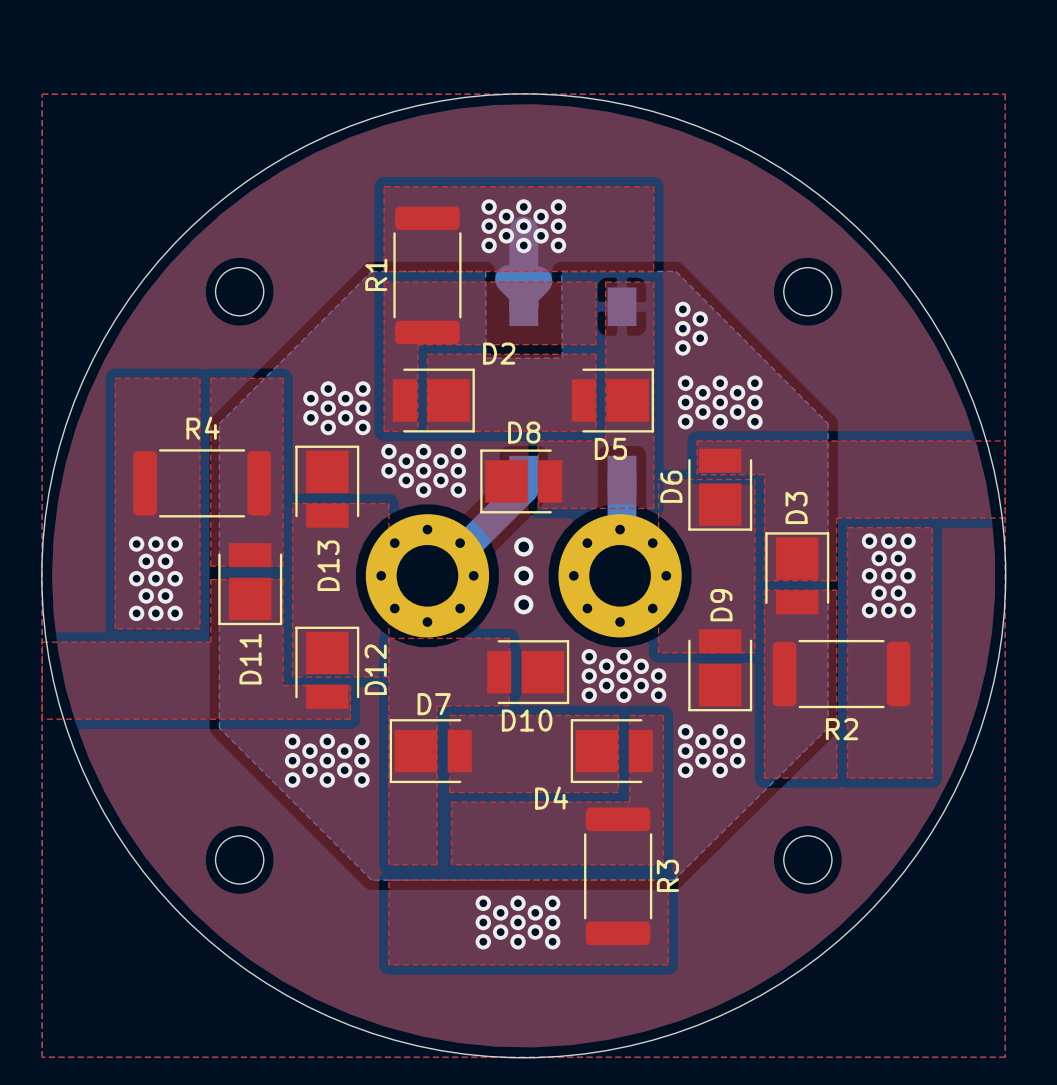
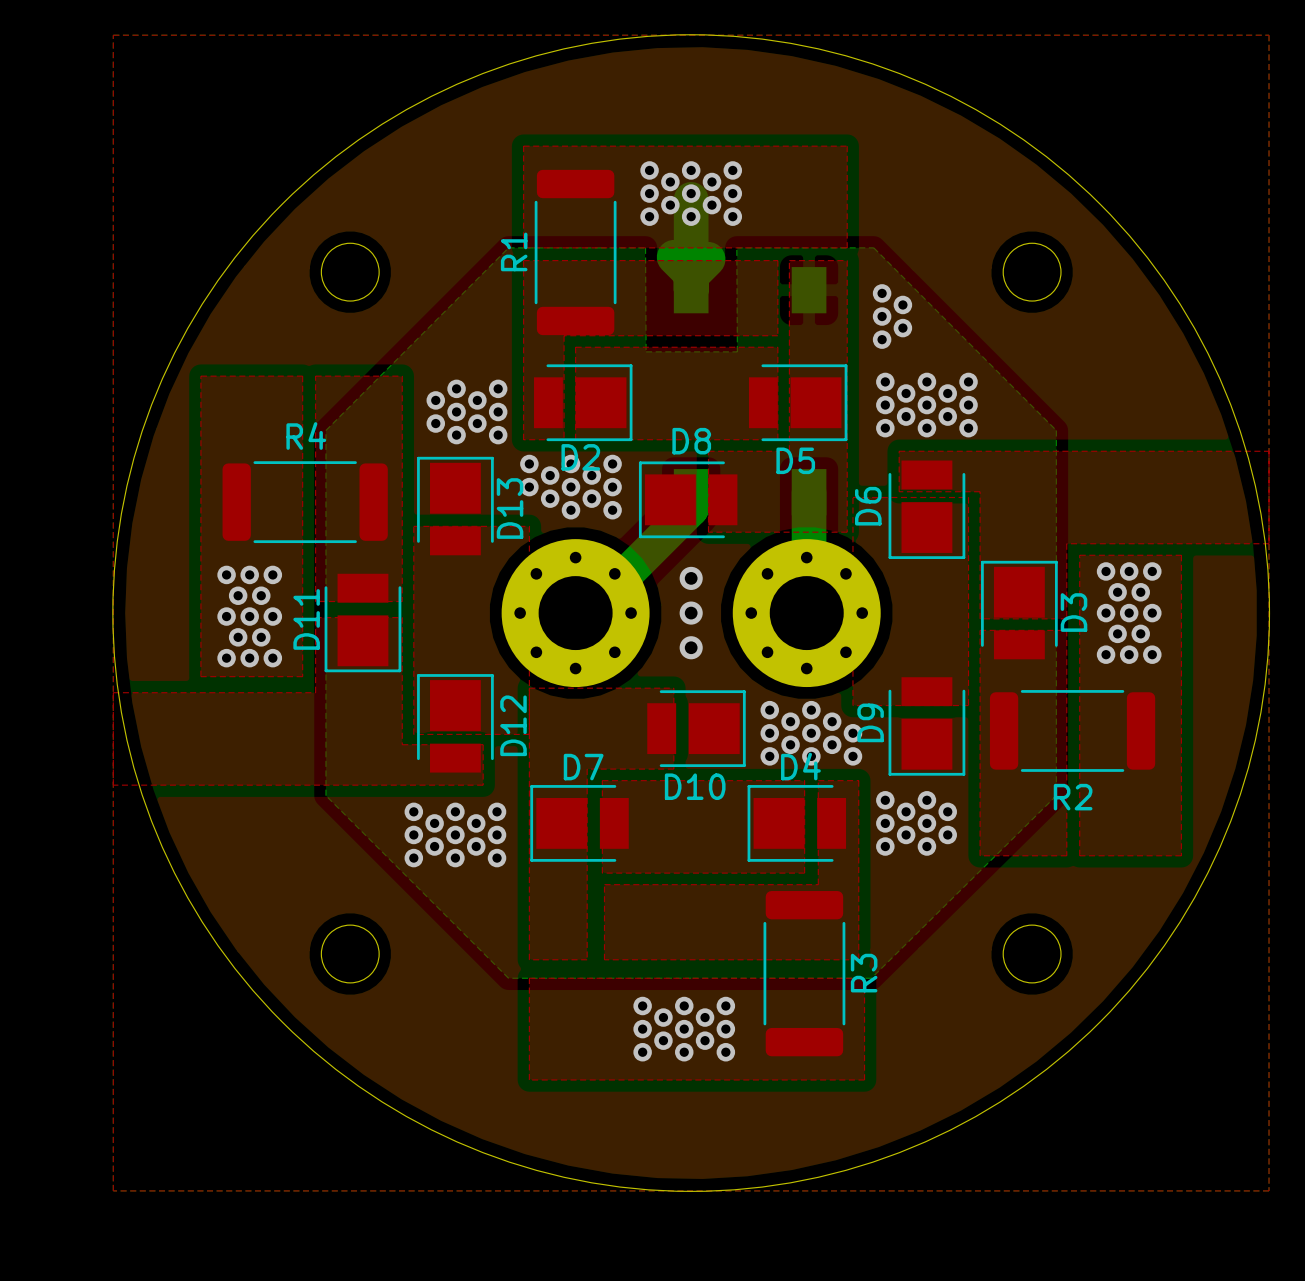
D2 name position: D2 (499, 353) -> D2 (580, 457)
D3 name position: D3 (796, 507) -> D3 (1074, 612)
D13 name position: D13 (328, 565) -> D13 (510, 508)
D9 name position: D9 (721, 605) -> D9 (870, 722)
D11 name position: D11 (250, 659) -> D11 (306, 619)
D4 name position: D4 (551, 798) -> D4 (800, 766)

